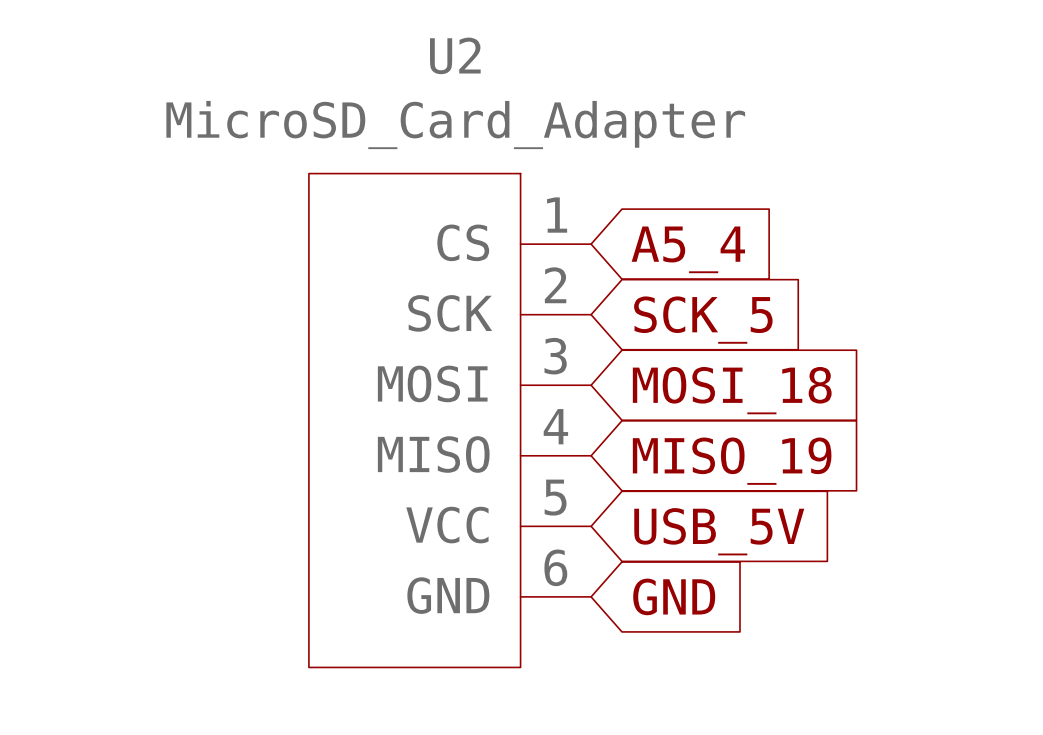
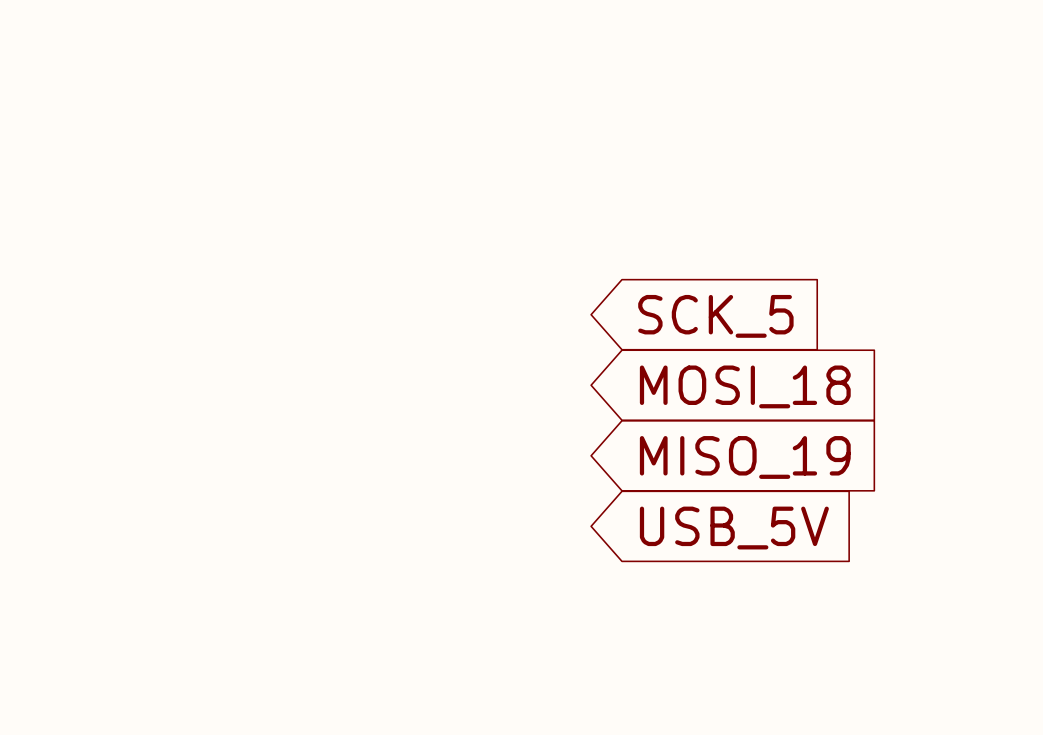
global label: A5_4 (688, 249) -> none
U2: MicroSD_Card_Adapter (450, 420) -> none
global label: GND (674, 596) -> none

